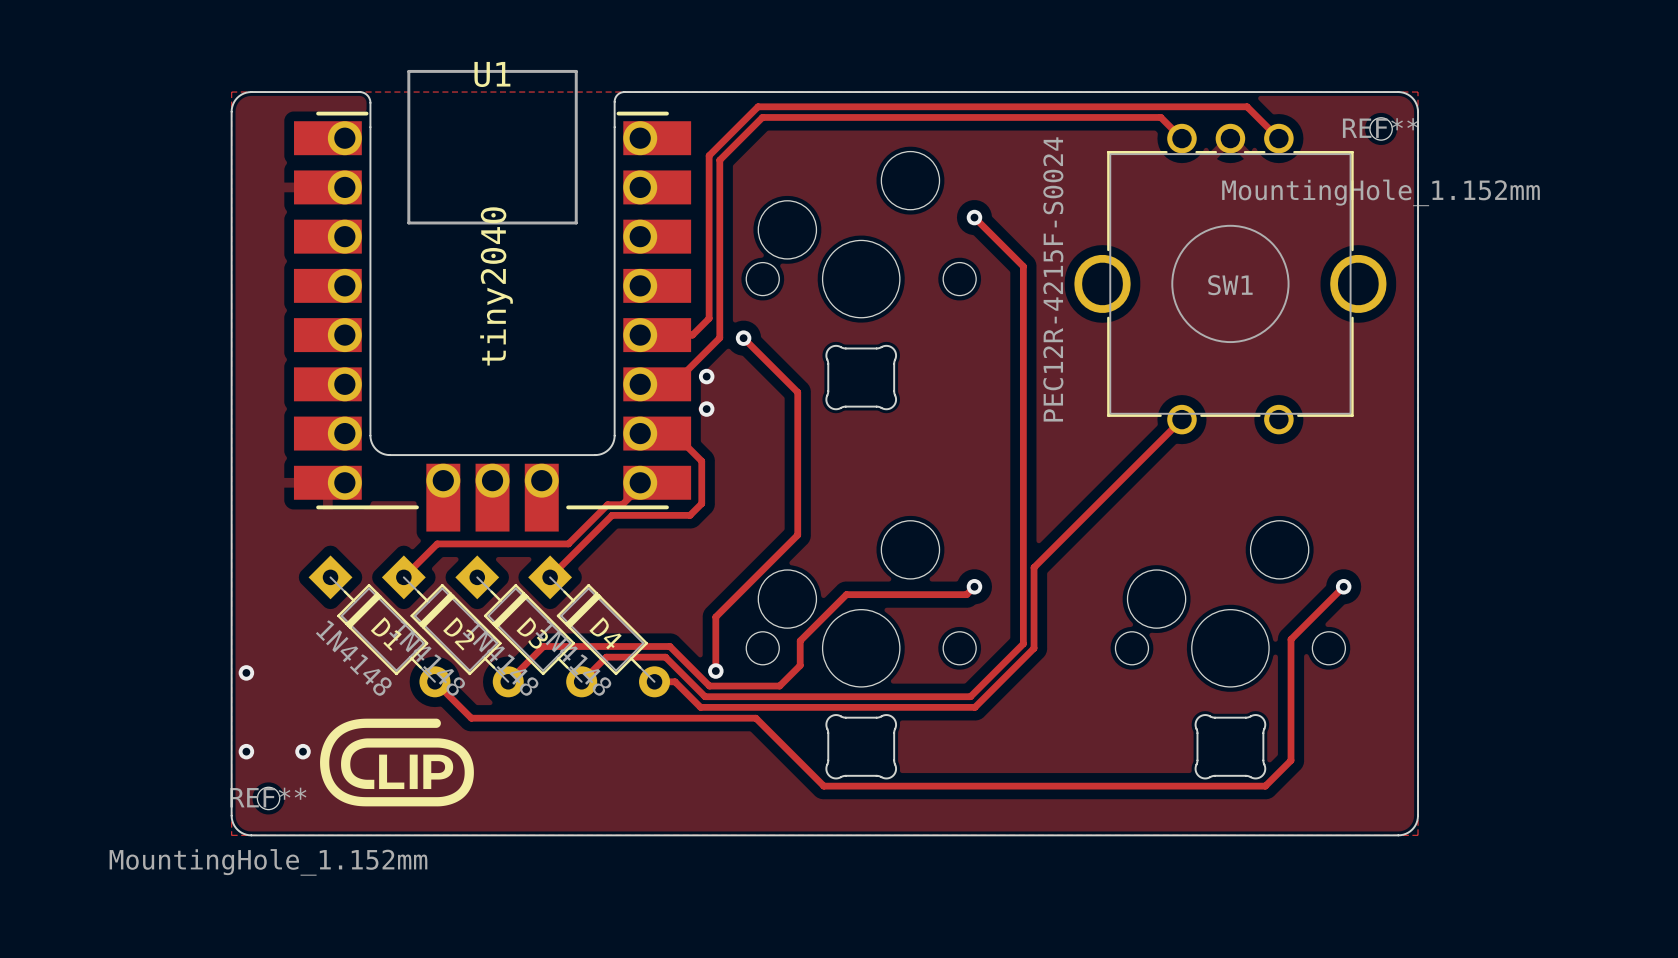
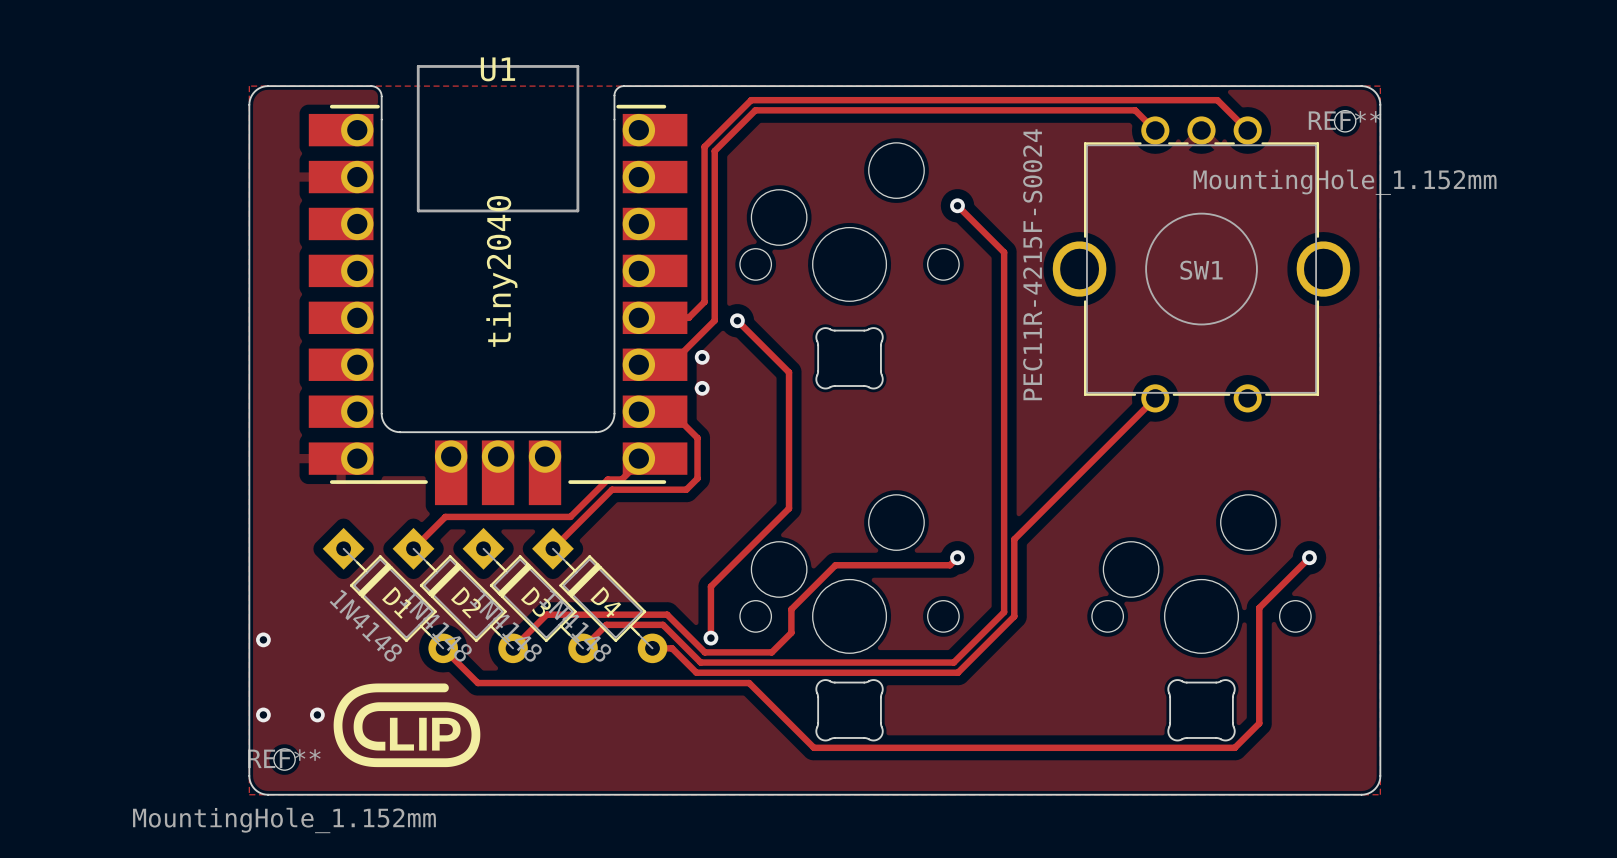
SW1 value: PEC12R-4215F-S0024 (1053, 279) -> PEC11R-4215F-S0024 (1032, 264)

